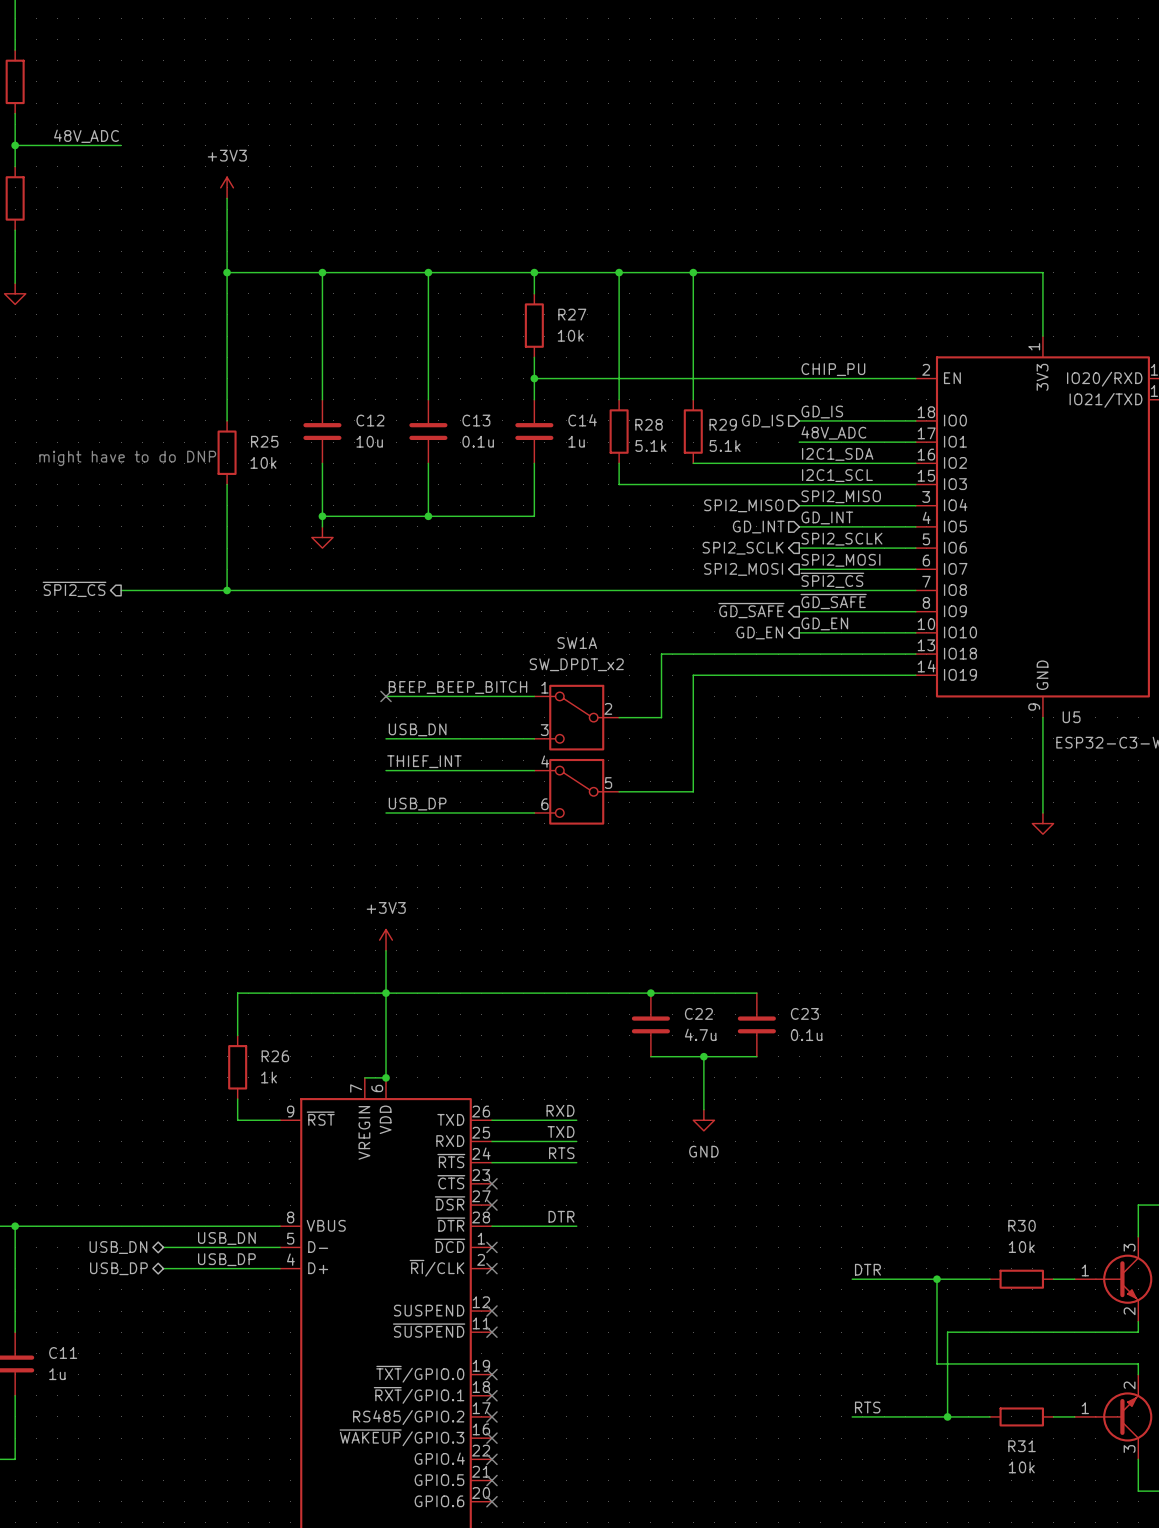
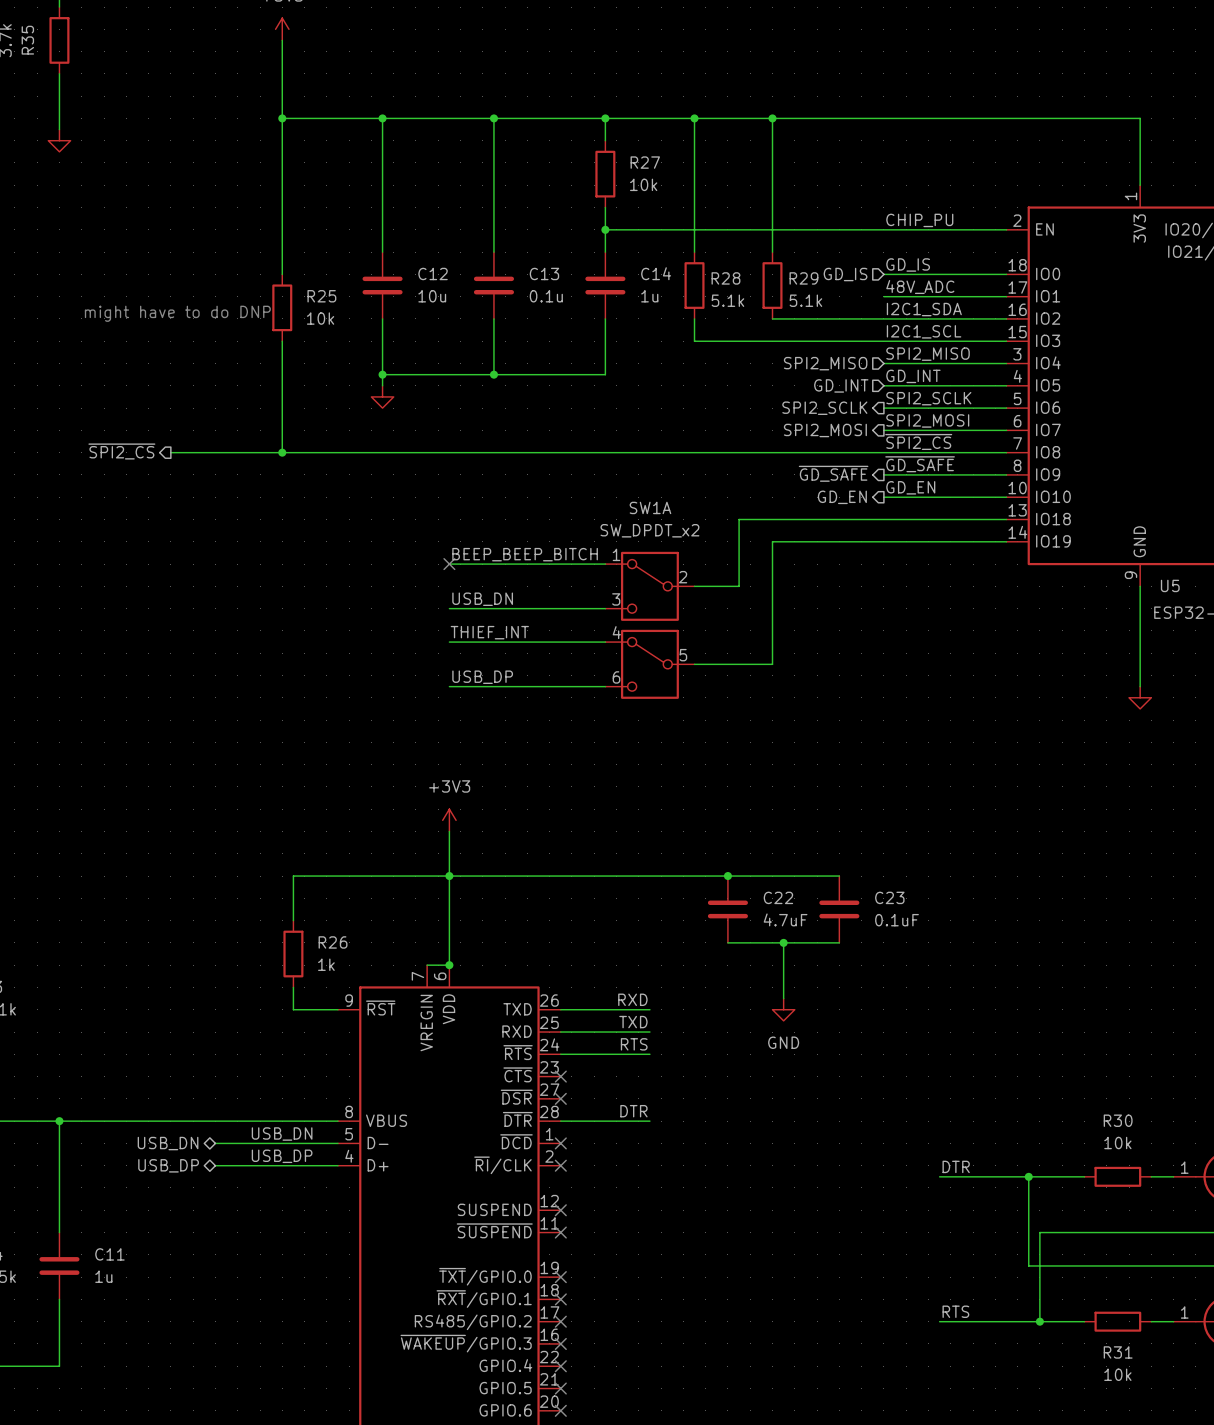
C22 value: 4.7u (700, 1034) -> 4.7uF (785, 919)
C23 value: 0.1u (806, 1035) -> 0.1uF (896, 920)

